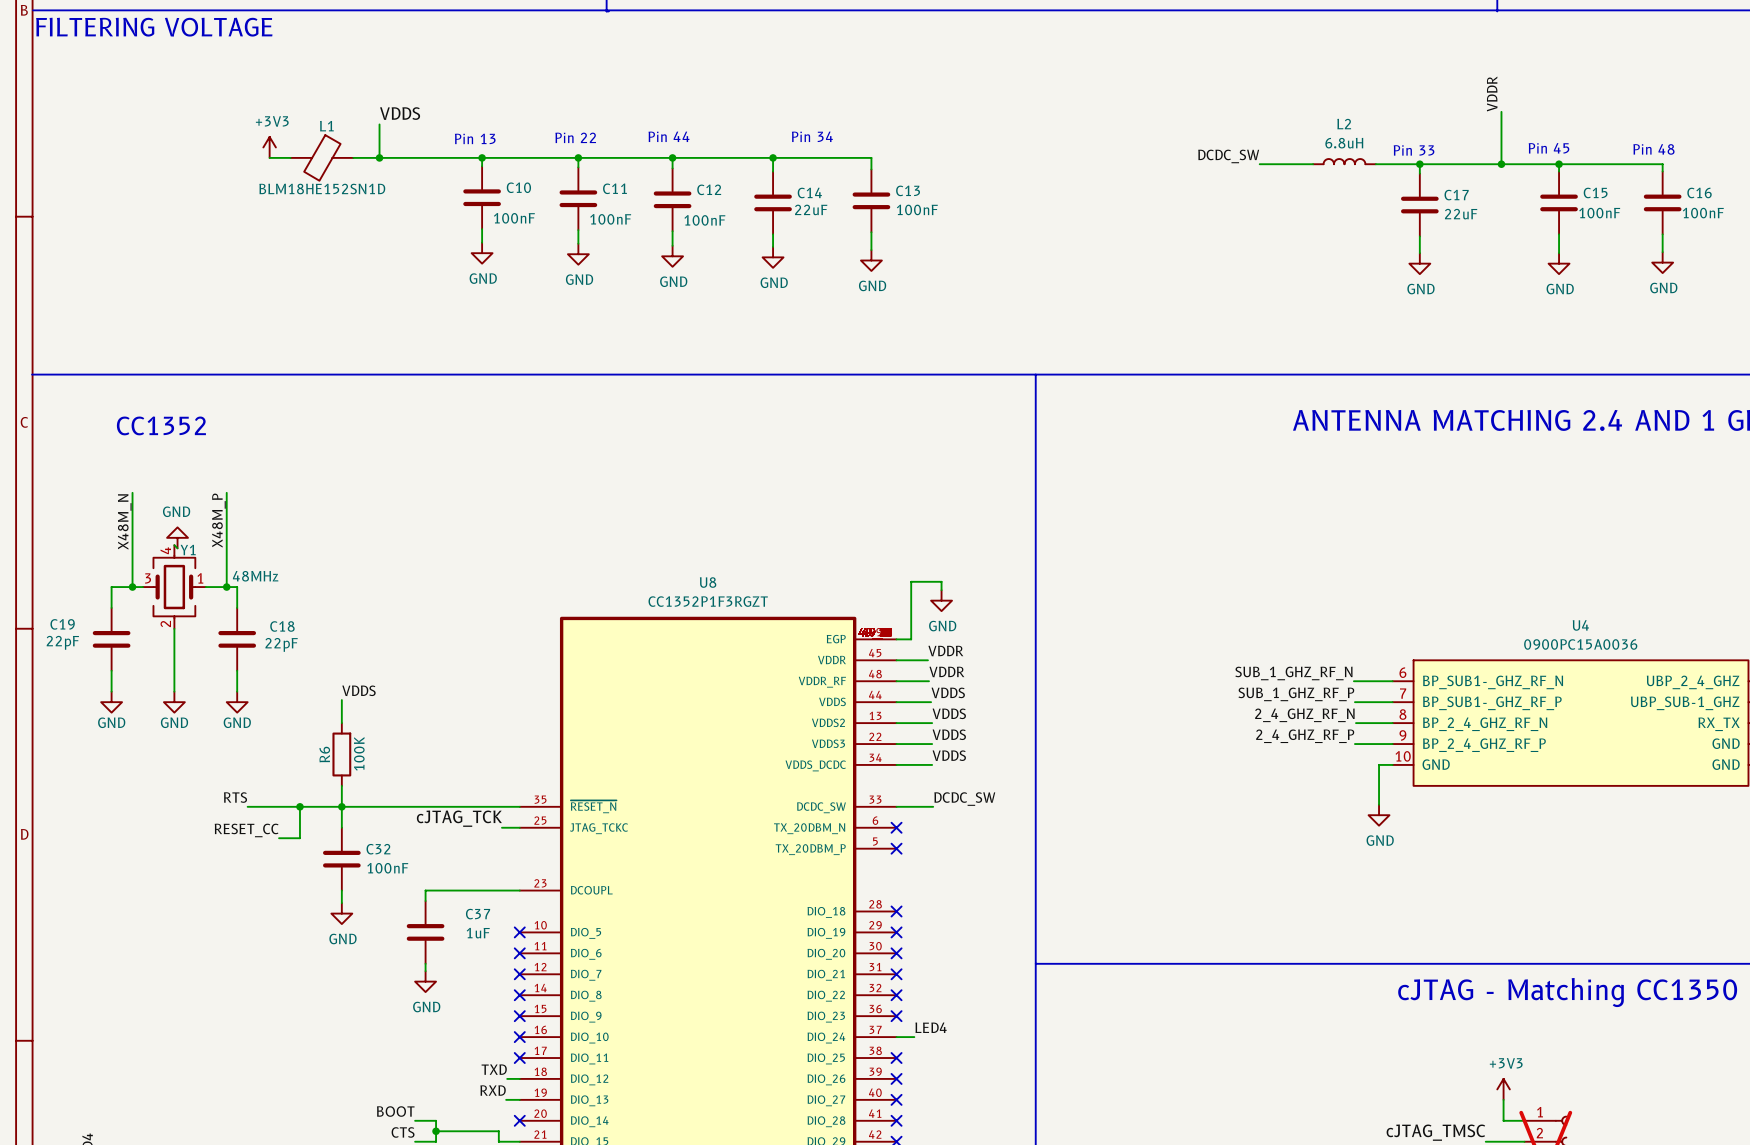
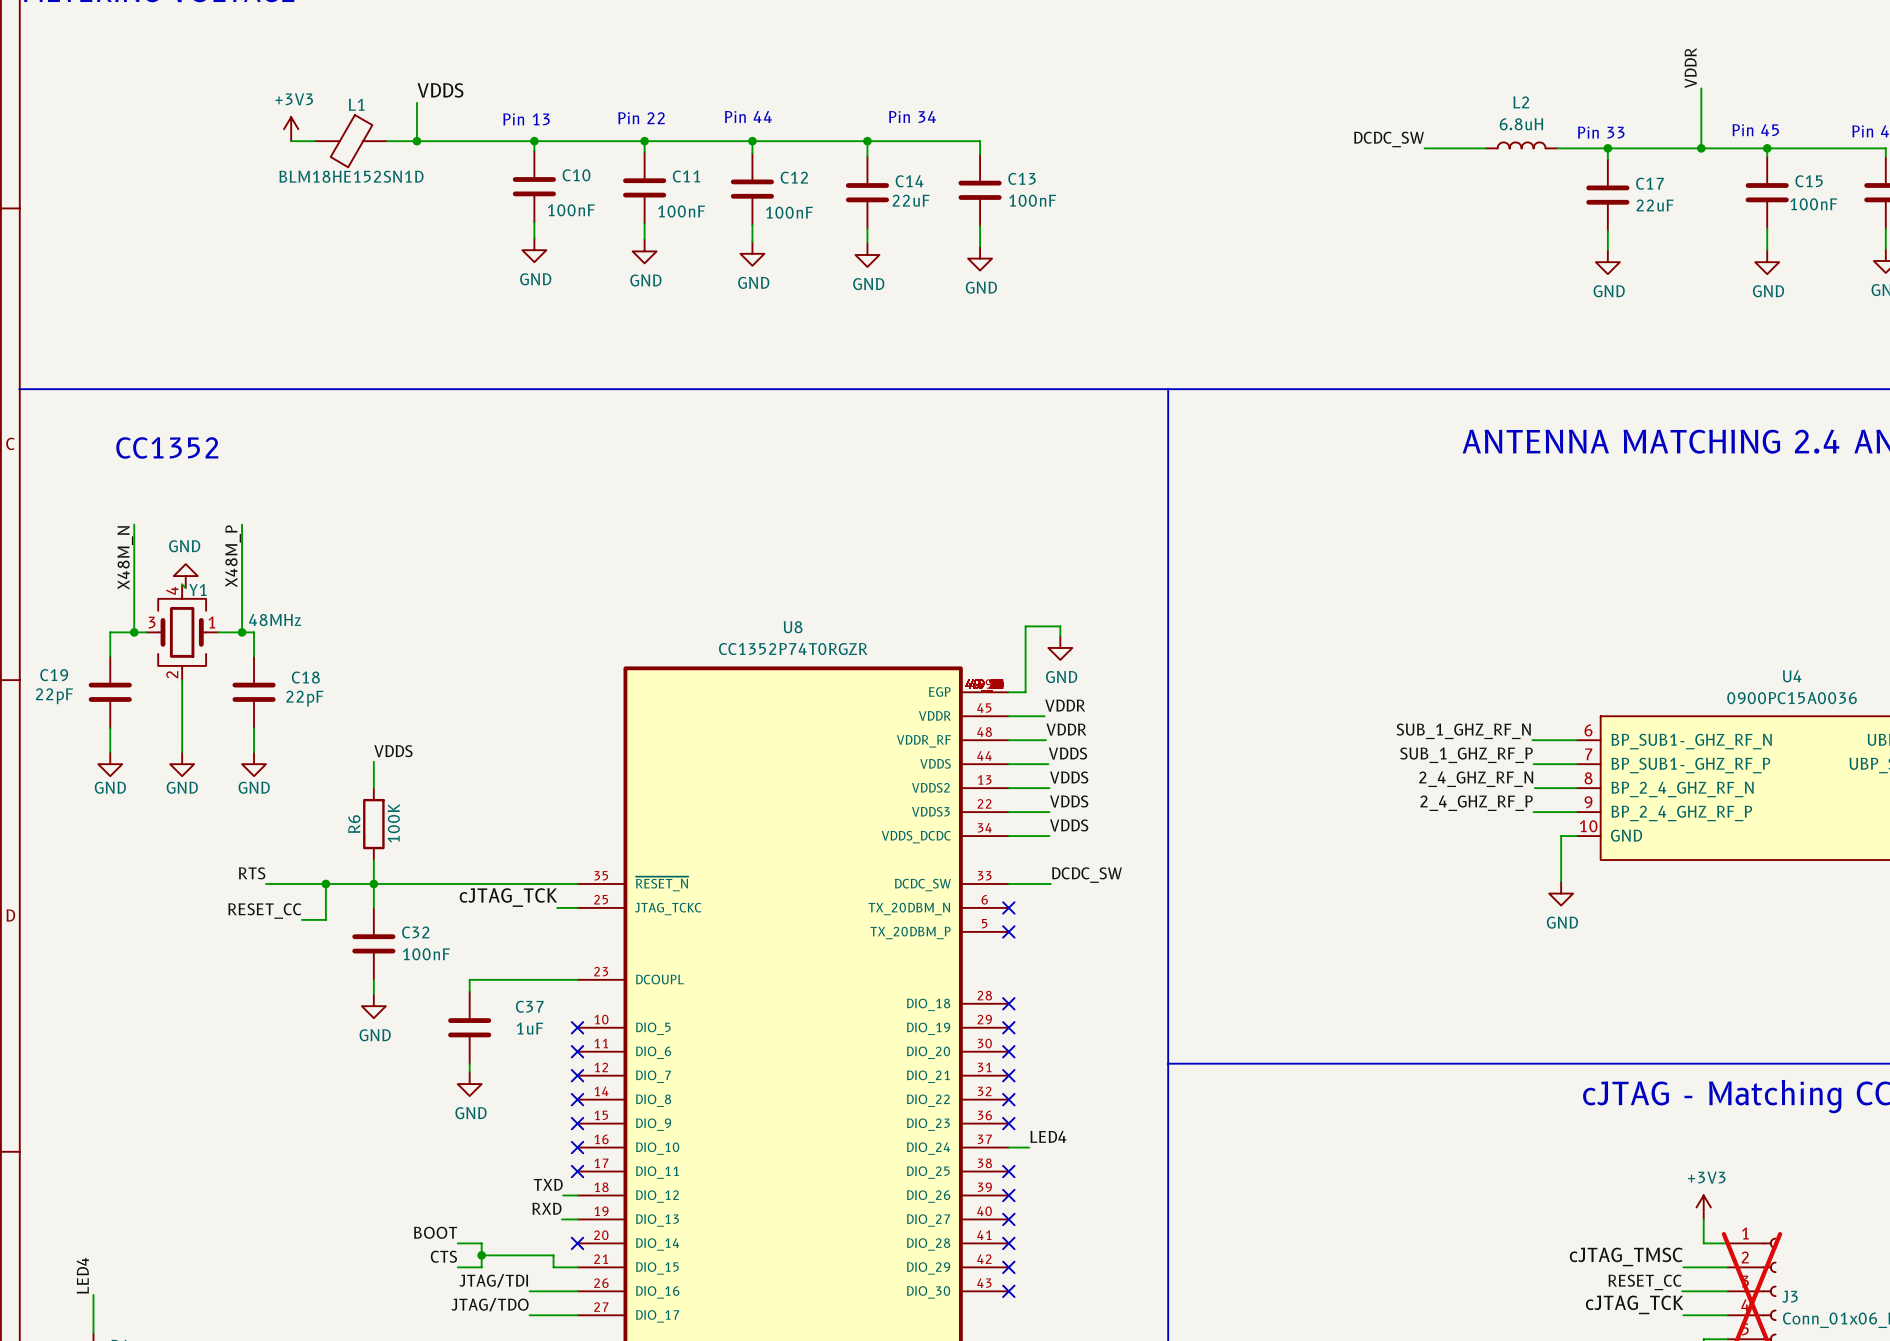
U8 value: CC1352P1F3RGZT (708, 601) -> CC1352P74T0RGZR (793, 649)

